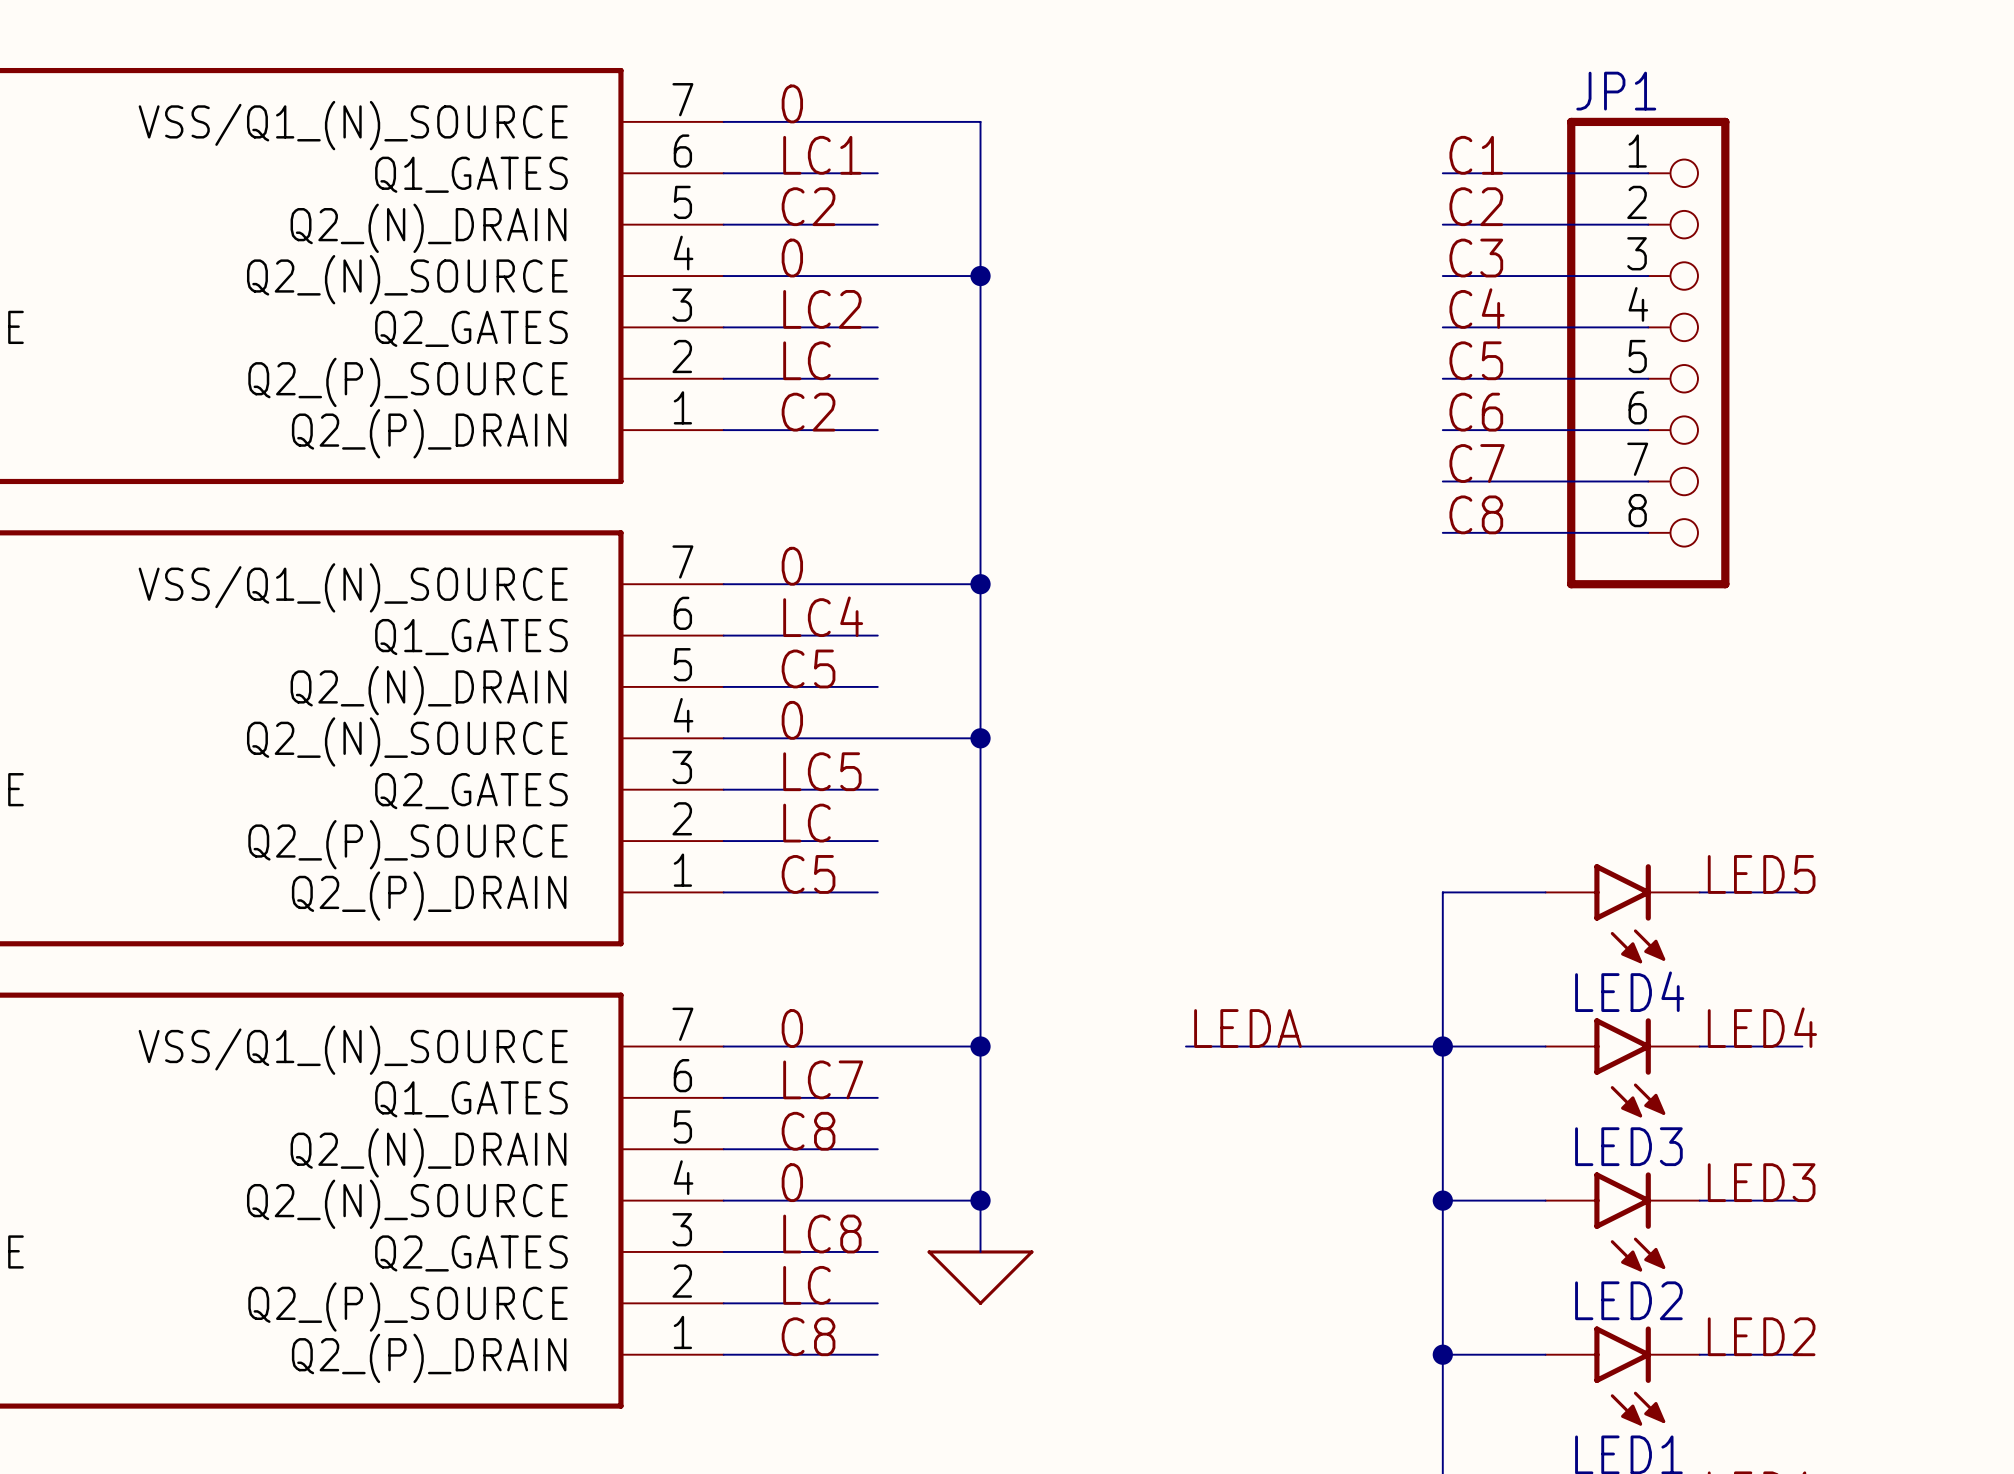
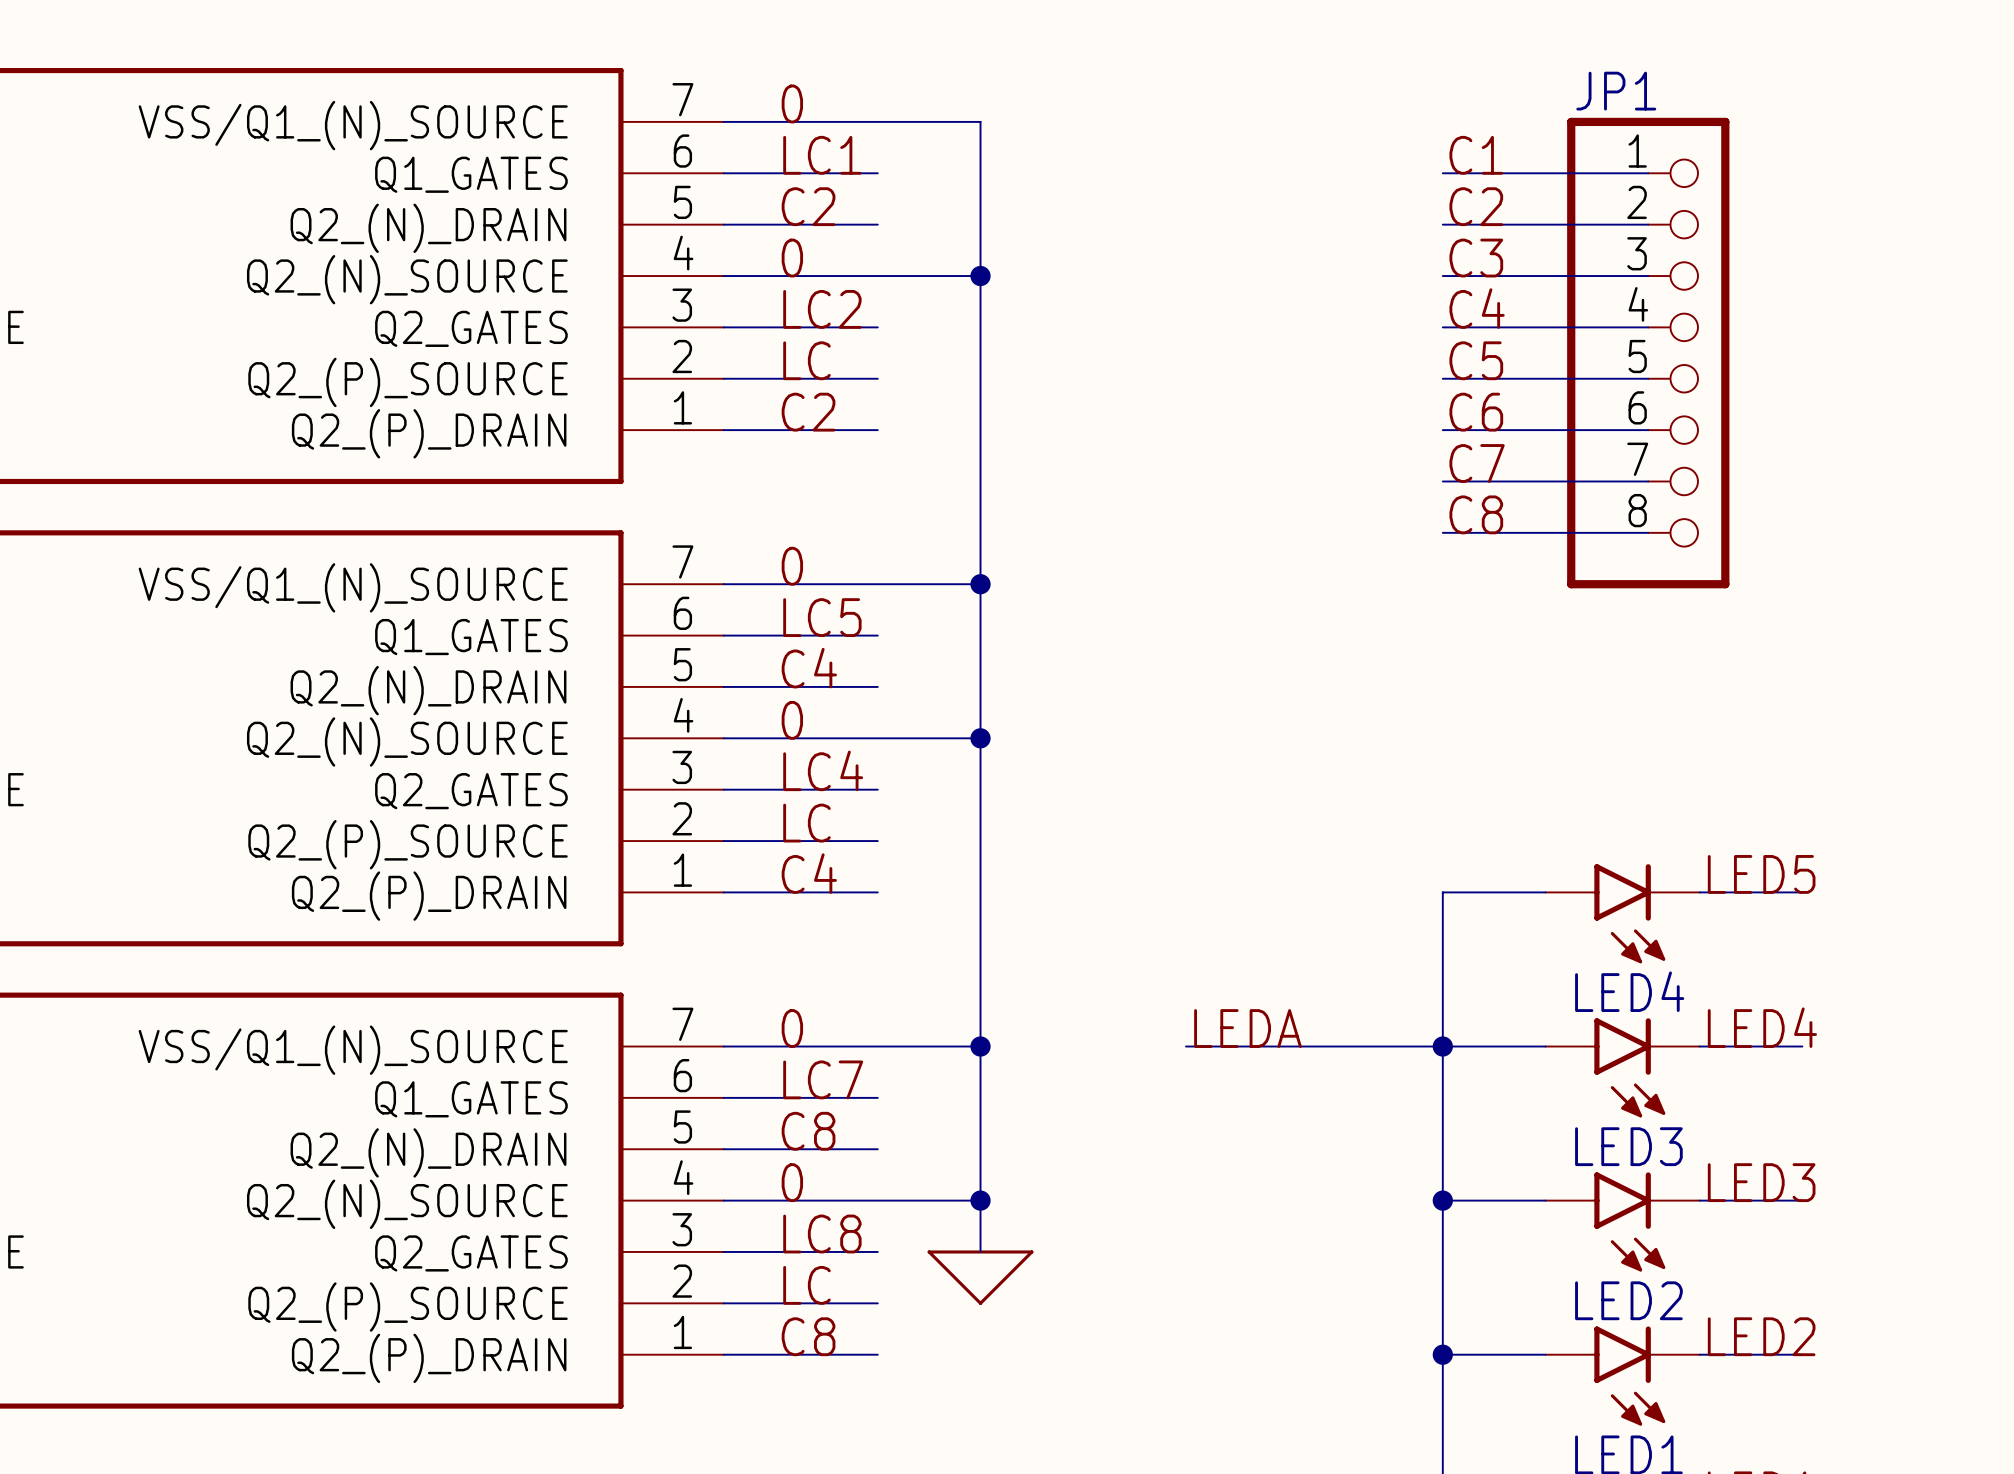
label: LC4 (823, 616) -> LC5 (822, 617)
label: C5 (808, 668) -> C4 (809, 668)
label: LC5 (822, 771) -> LC4 (823, 770)
label: C5 (808, 874) -> C4 (809, 873)

